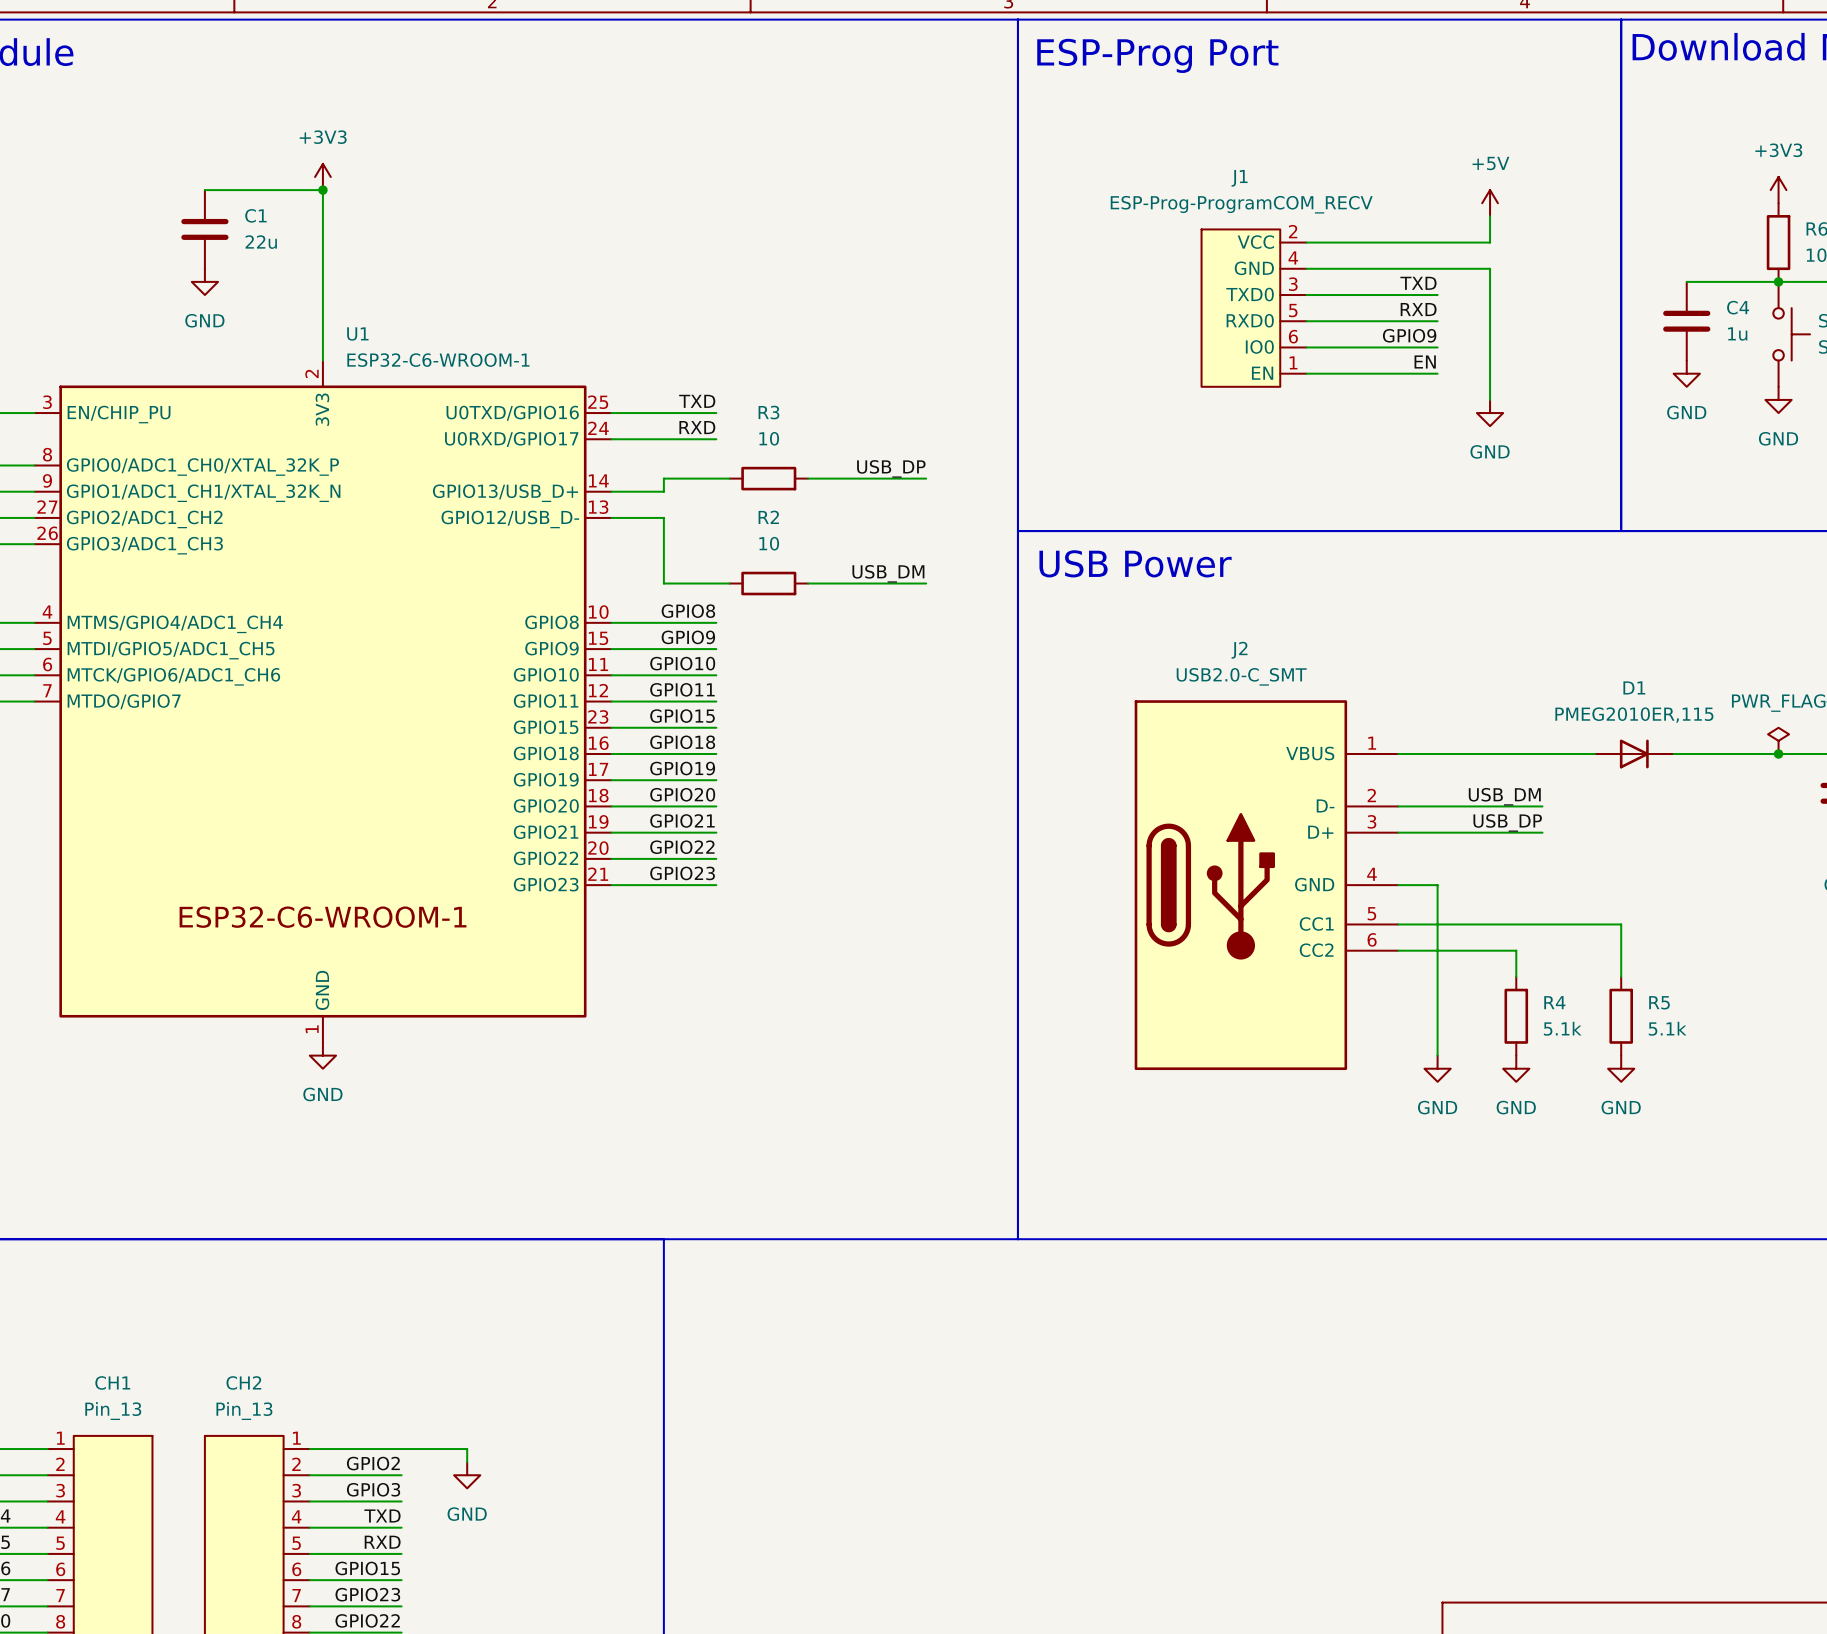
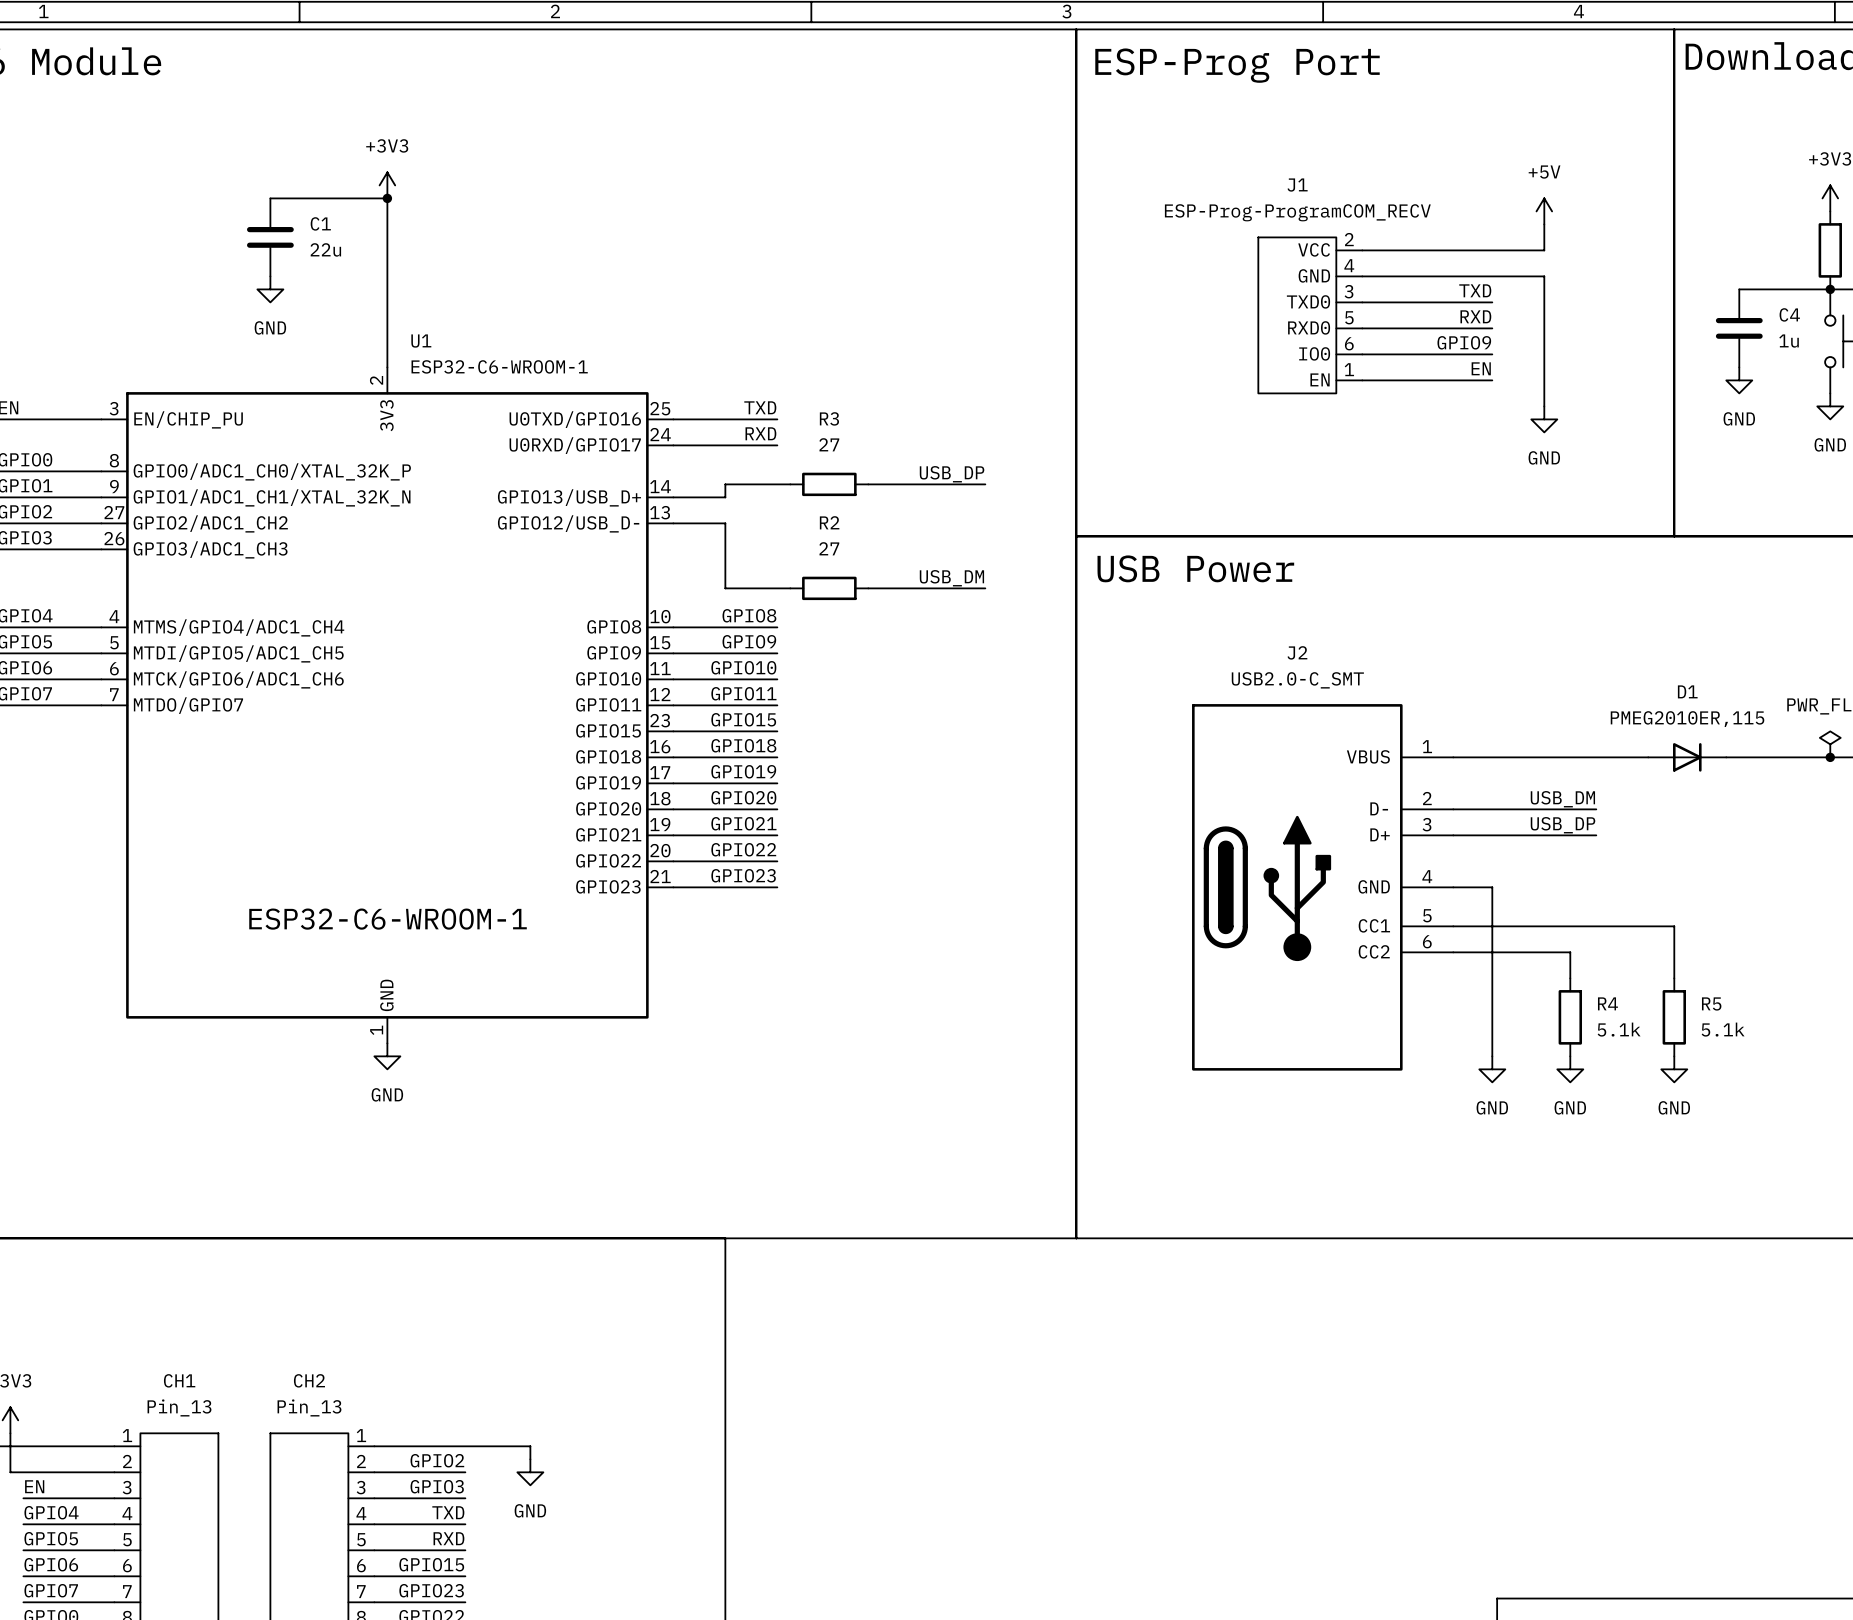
R3 value: 10 (769, 438) -> 27 (829, 444)
R2 value: 10 (769, 543) -> 27 (829, 548)

